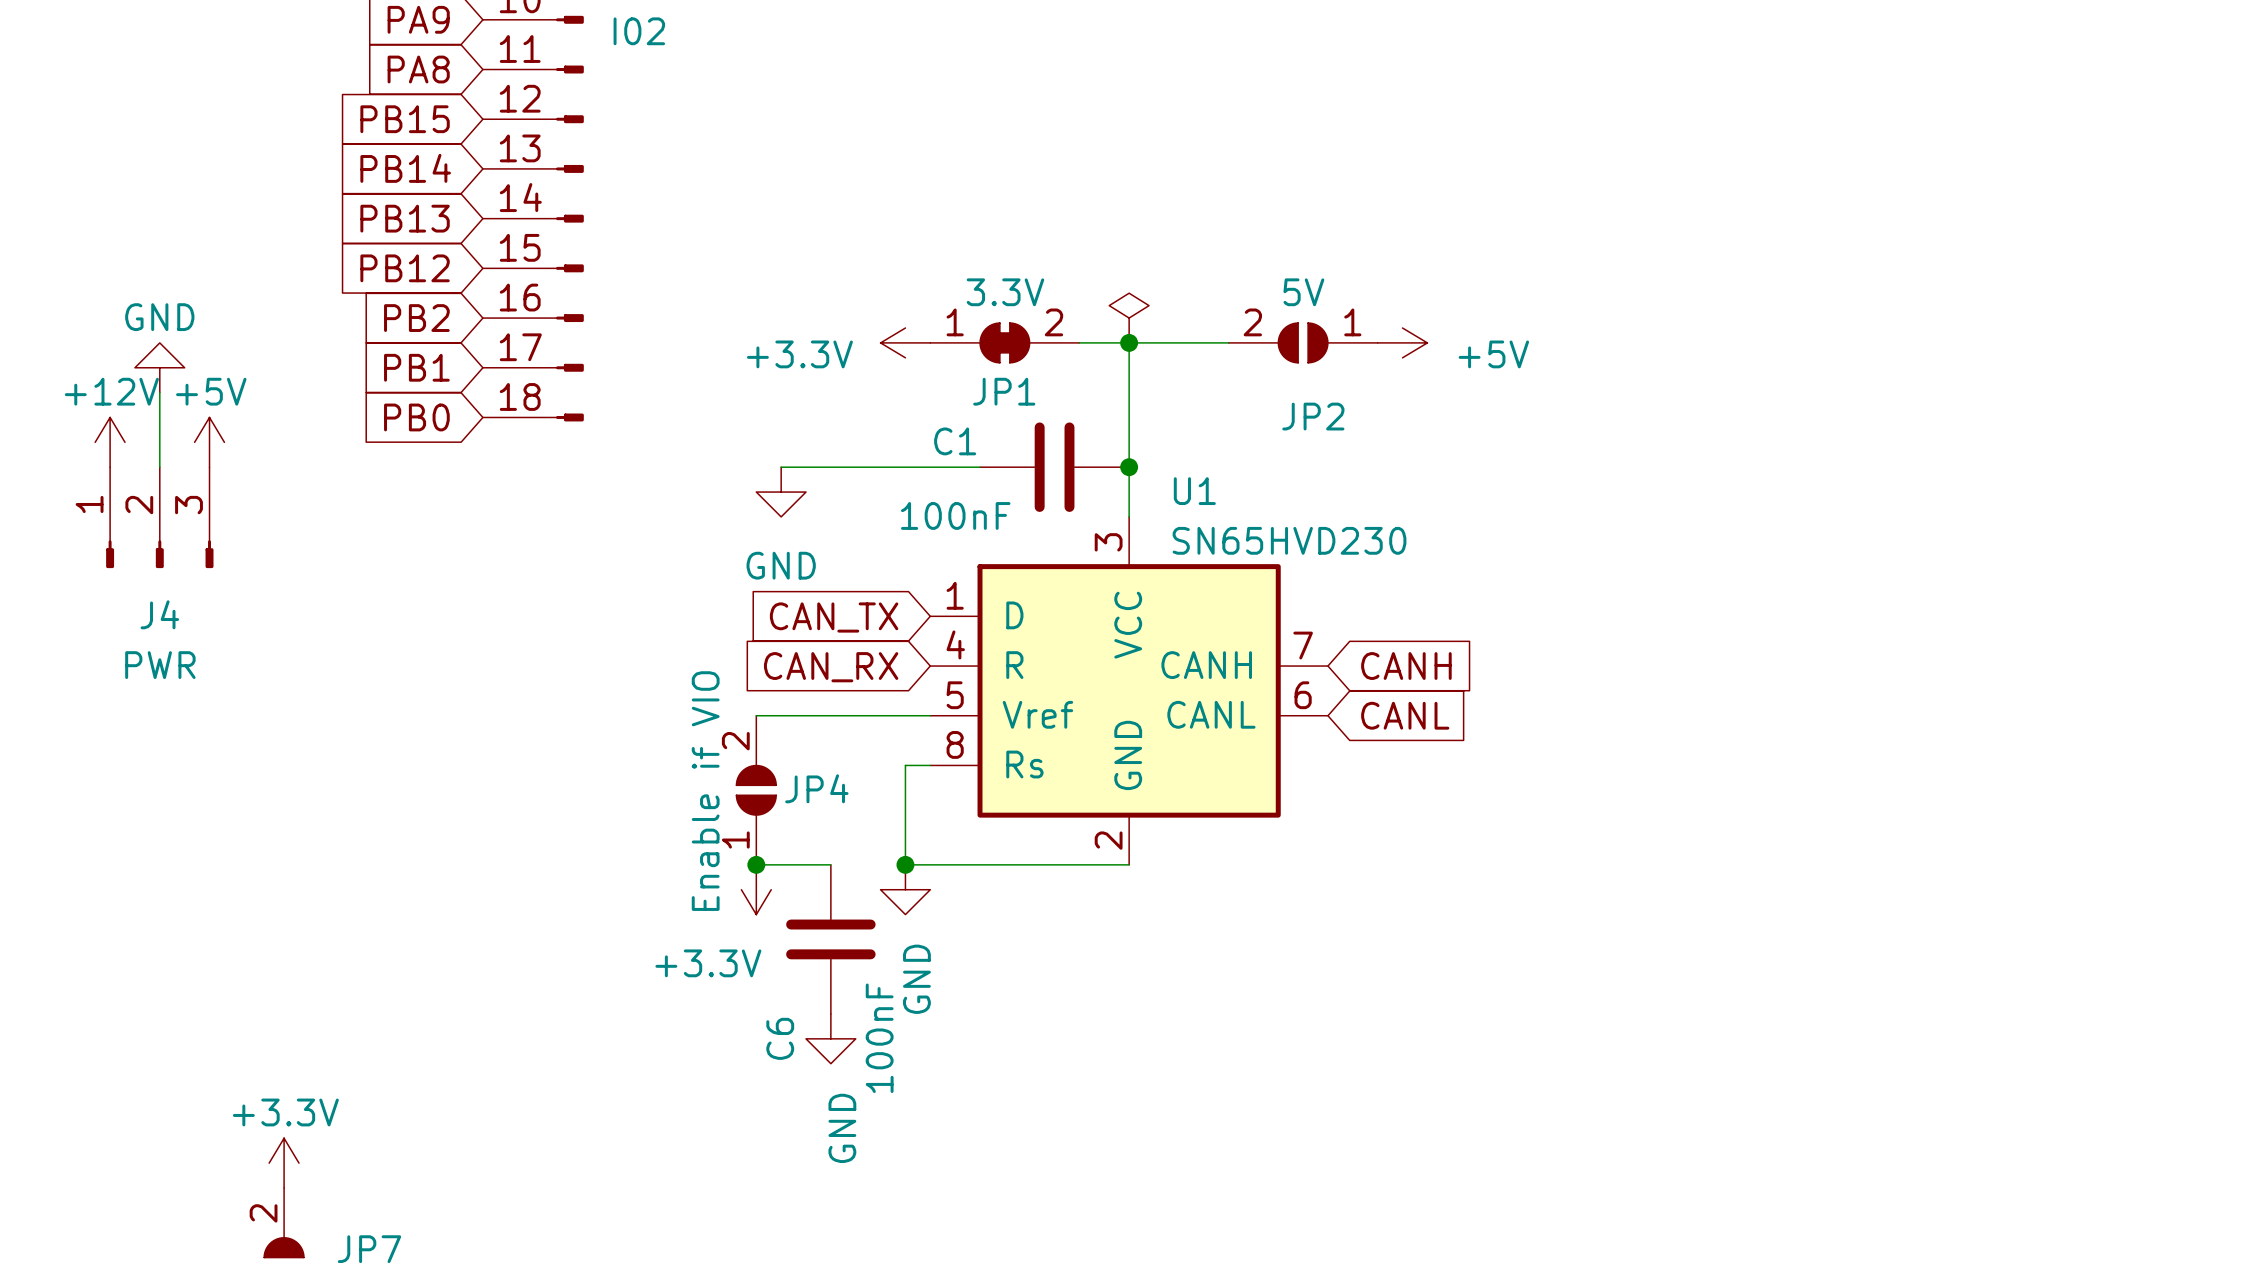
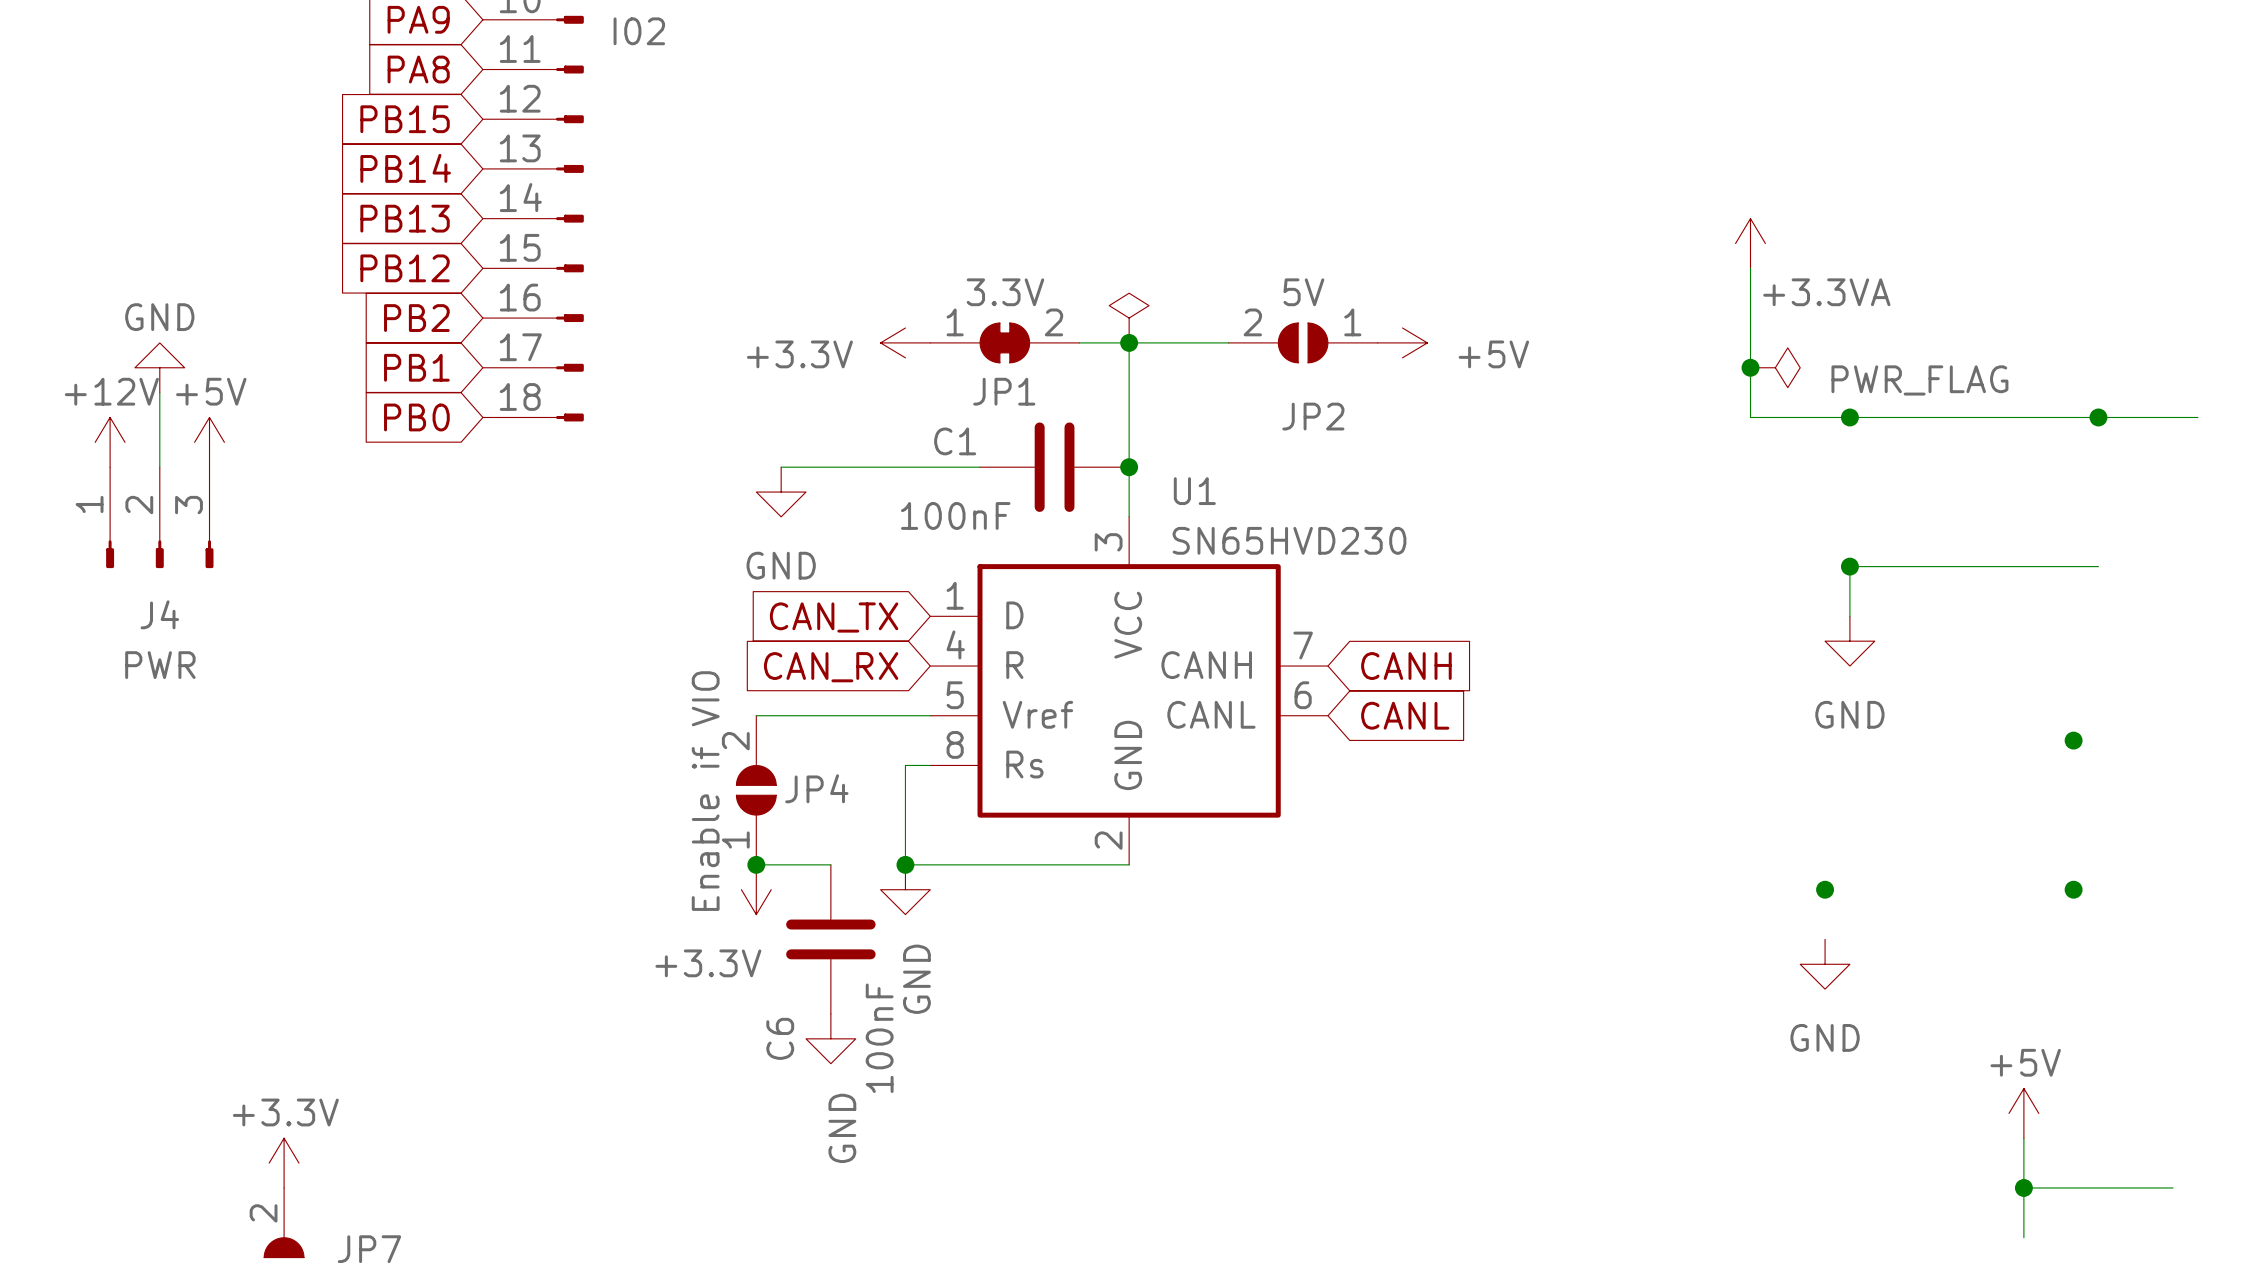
power symbol: none -> +3.3VA (1750, 243)
wire: none -> (1750, 268) (1750, 417) (2197, 417)
junction: none -> (1750, 367)
power symbol: none -> PWR_FLAG (1775, 367)
junction: none -> (1849, 417)
junction: none -> (2098, 417)
junction: none -> (1849, 566)
wire: none -> (2098, 566) (1849, 566) (1849, 616)
power symbol: none -> GND (1849, 641)
junction: none -> (2073, 740)
junction: none -> (1825, 889)
junction: none -> (2073, 889)
power symbol: none -> GND (1825, 964)
power symbol: none -> +5V (2023, 1113)
wire: none -> (2023, 1138) (2023, 1237)
wire: none -> (2023, 1187) (2173, 1187)
junction: none -> (2023, 1187)

